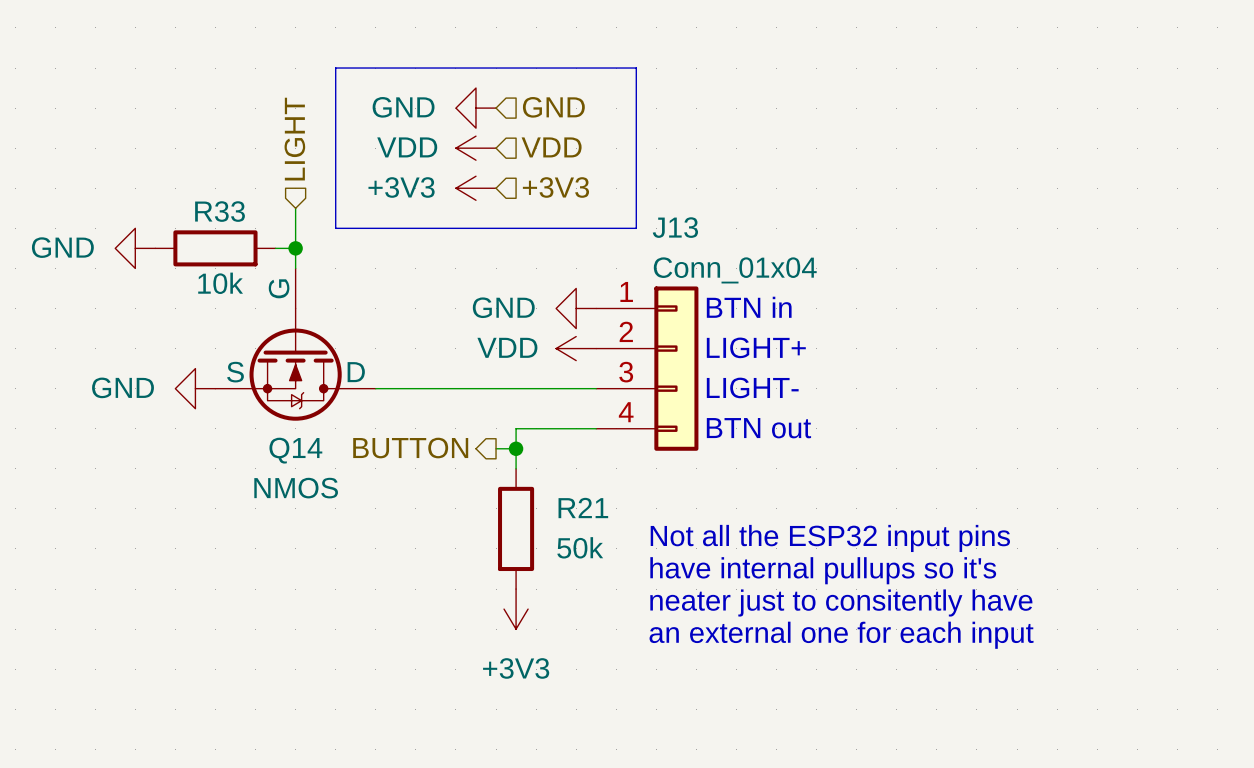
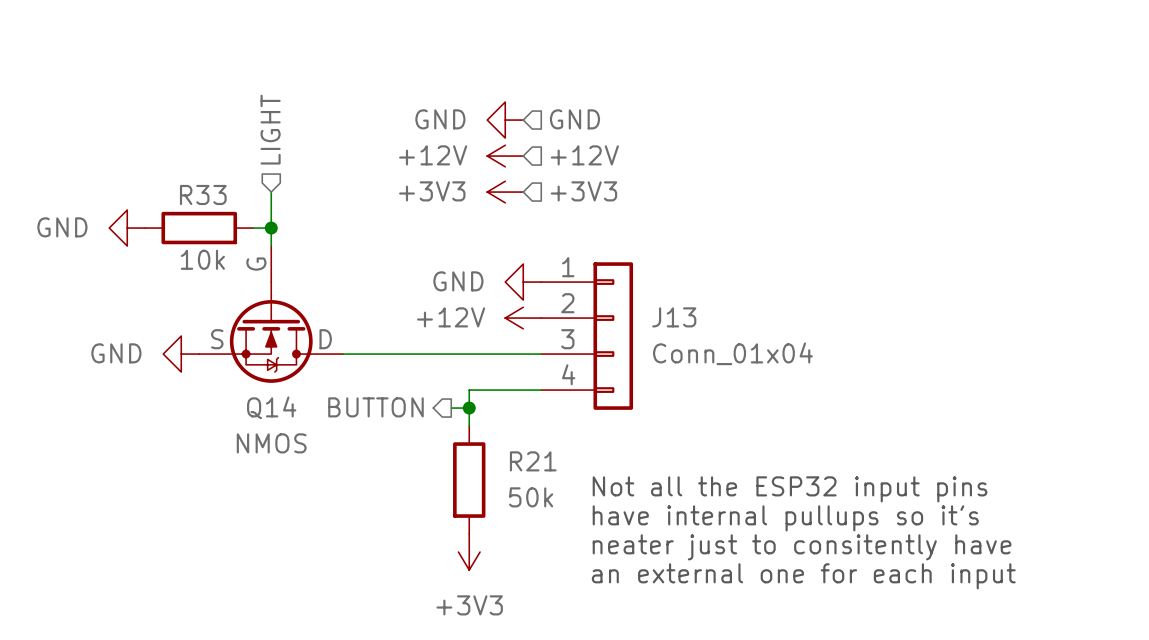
line: (335, 68) (636, 68) (636, 228) (335, 228) (335, 68) -> none
hierarchical label position: GND (553, 107) -> GND (574, 119)
power symbol position: GND (475, 108) -> GND (505, 120)
hierarchical label: VDD (551, 147) -> none
power symbol: VDD (475, 148) -> none
hierarchical label: none -> +12V (584, 155)
power symbol: none -> +12V (505, 156)
hierarchical label position: +3V3 (555, 187) -> +3V3 (583, 191)
power symbol position: +3V3 (475, 188) -> +3V3 (505, 192)
J13 name position: J13 (675, 227) -> J13 (674, 317)
J13 value position: Conn_01x04 (735, 270) -> Conn_01x04 (732, 353)
text: BTN in (749, 307) -> none
text: LIGHT+ (756, 347) -> none
power symbol: VDD (576, 348) -> +12V (523, 318)
text: LIGHT- (752, 387) -> none
text: BTN out (758, 428) -> none

